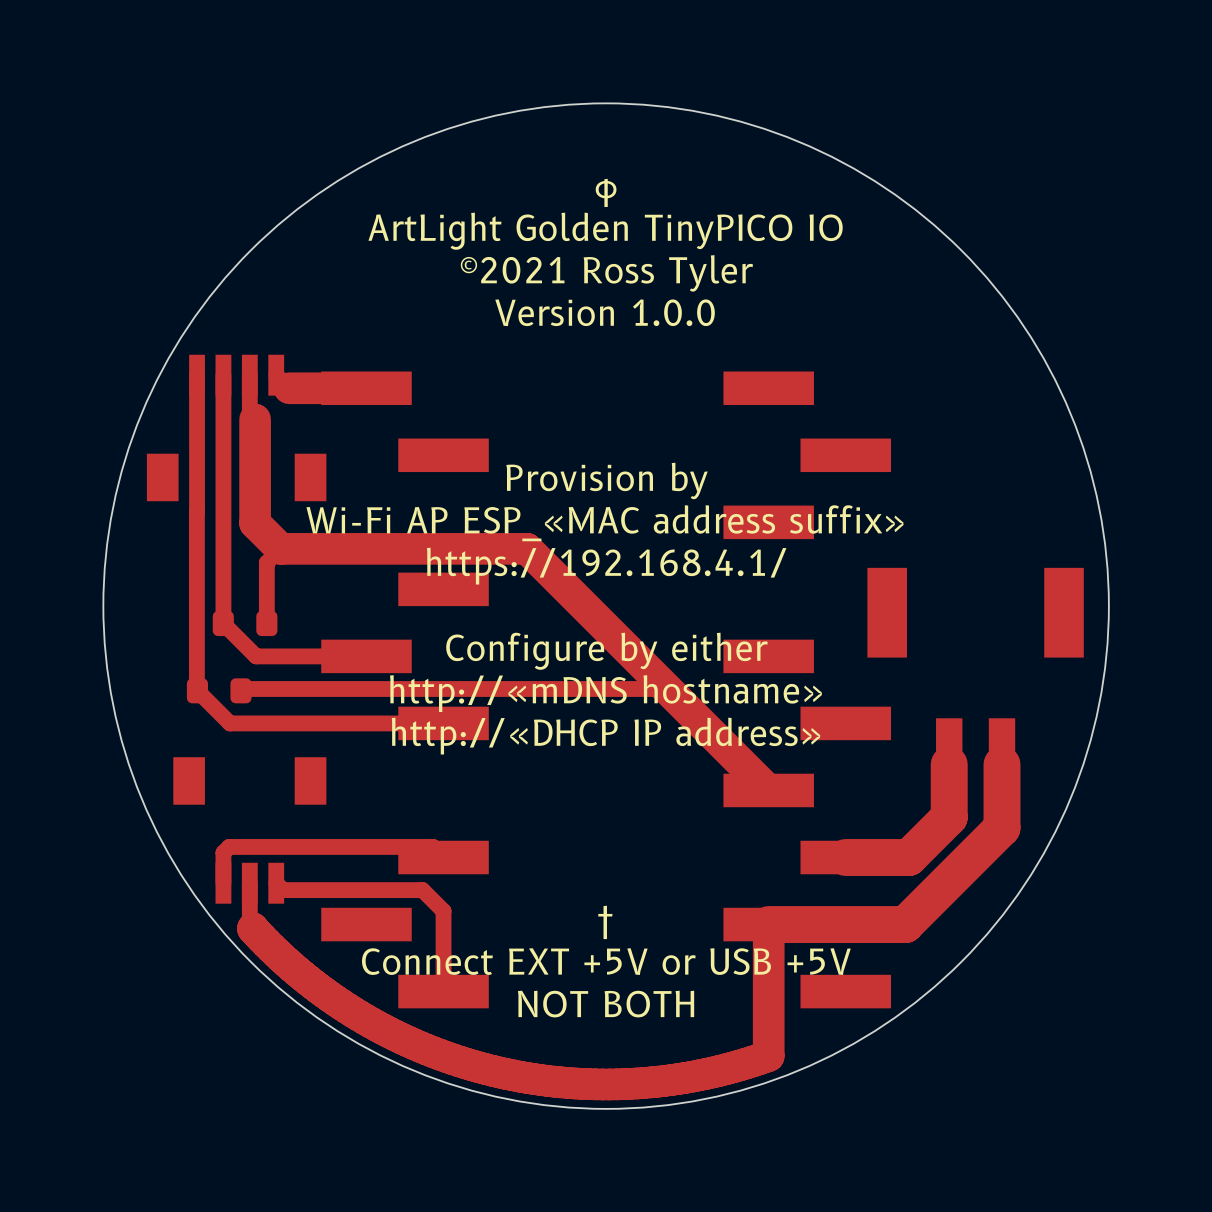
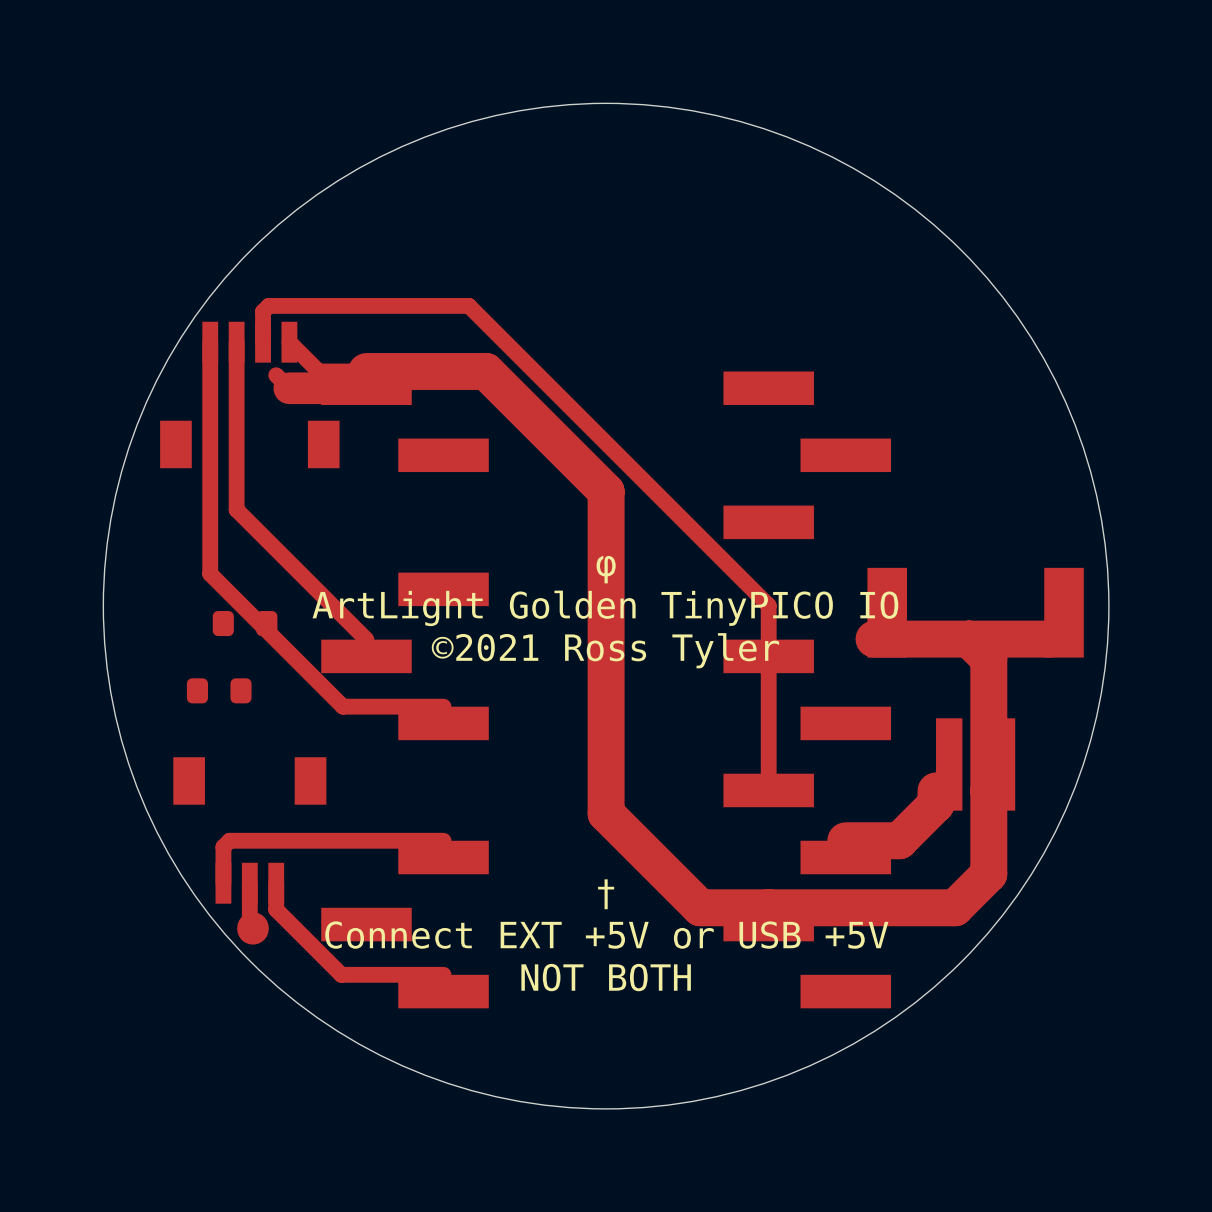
text: φ (606, 192) -> none
text position: ArtLight Golden TinyPICO IO (605, 231) -> ArtLight Golden TinyPICO IO (605, 608)
text: ©2021 Ross Tyler (606, 273) -> none
text: Version 1.0.0 (605, 312) -> none
top track: none -> (210, 342) (210, 573) (342, 706) (443, 706)
top track: none -> (236, 342) (236, 509) (366, 639)
top track: none -> (263, 342) (263, 311) (268, 305) (468, 305) (768, 605) (768, 773)
top track: none -> (289, 342) (318, 371) (486, 371) (606, 491) (606, 813) (700, 907) (955, 907) (988, 874) (988, 658) (969, 639)
top track: (197, 375) (197, 511) -> none
top track: (223, 375) (223, 623) (256, 656) (366, 656) -> none
top track: (249, 375) (249, 414) (255, 419) (255, 523) (280, 548) -> none
part position: (236, 427) -> (249, 394)
text: Provision by (607, 480) -> none
top track: (196, 511) (196, 690) (230, 723) (443, 723) (440, 726) -> none
text: Wi-Fi AP ESP_«MAC address suffix» (604, 523) -> none
top track: (280, 548) (527, 548) (768, 790) (667, 688) (242, 688) (240, 690) -> none
top track: (280, 548) (266, 562) (266, 623) -> none
text: https://192.168.4.1/ (606, 566) -> φ (606, 569)
top track: none -> (1050, 639) (874, 639)
text: Configure by either (606, 651) -> ©2021 Ross Tyler (605, 650)
text: http://«mDNS hostname» (605, 693) -> none
text: http://«DHCP IP address» (605, 736) -> none
top track: (949, 764) (949, 817) (908, 857) (845, 857) -> none
top track: (1002, 764) (1002, 827) (905, 924) (768, 924) (768, 1055) (705, 1073) (644, 1082) (581, 1083) (520, 1076) (459, 1061) (401, 1038) (347, 1008) (297, 971) (252, 928) -> none
top track: none -> (936, 790) (936, 804) (899, 840) (845, 840)
top track: (223, 852) (229, 846) (432, 846) (443, 857) -> (223, 852) (223, 846) (229, 840) (443, 840)
top track: (276, 883) (283, 890) (422, 890) (443, 911) (443, 991) -> (276, 883) (276, 909) (341, 974) (443, 974)
text position: † (605, 922) -> † (606, 894)
text position: Connect EXT +5V or USB +5V (606, 961) -> Connect EXT +5V or USB +5V (606, 935)
text position: NOT BOTH (606, 1004) -> NOT BOTH (606, 977)

